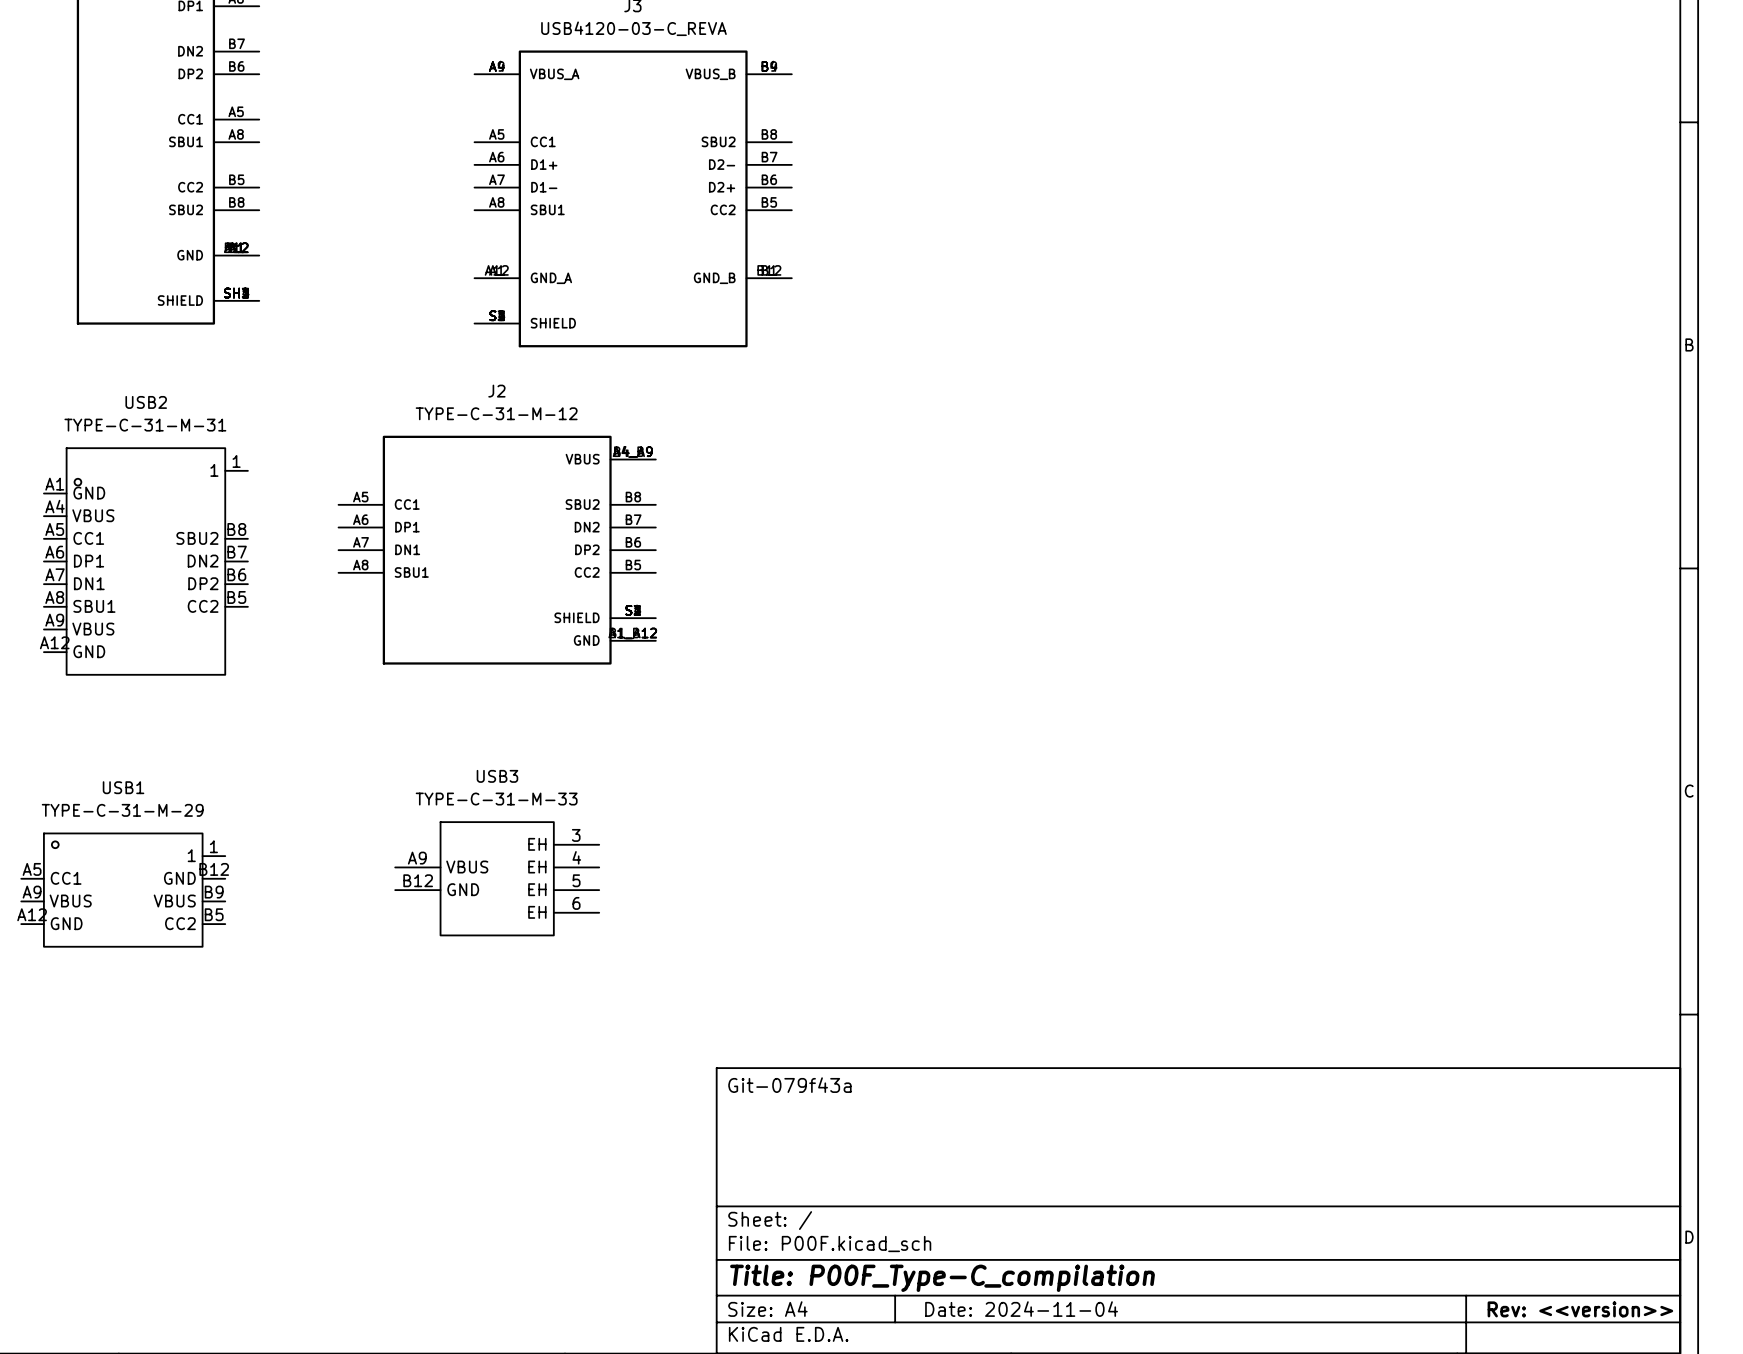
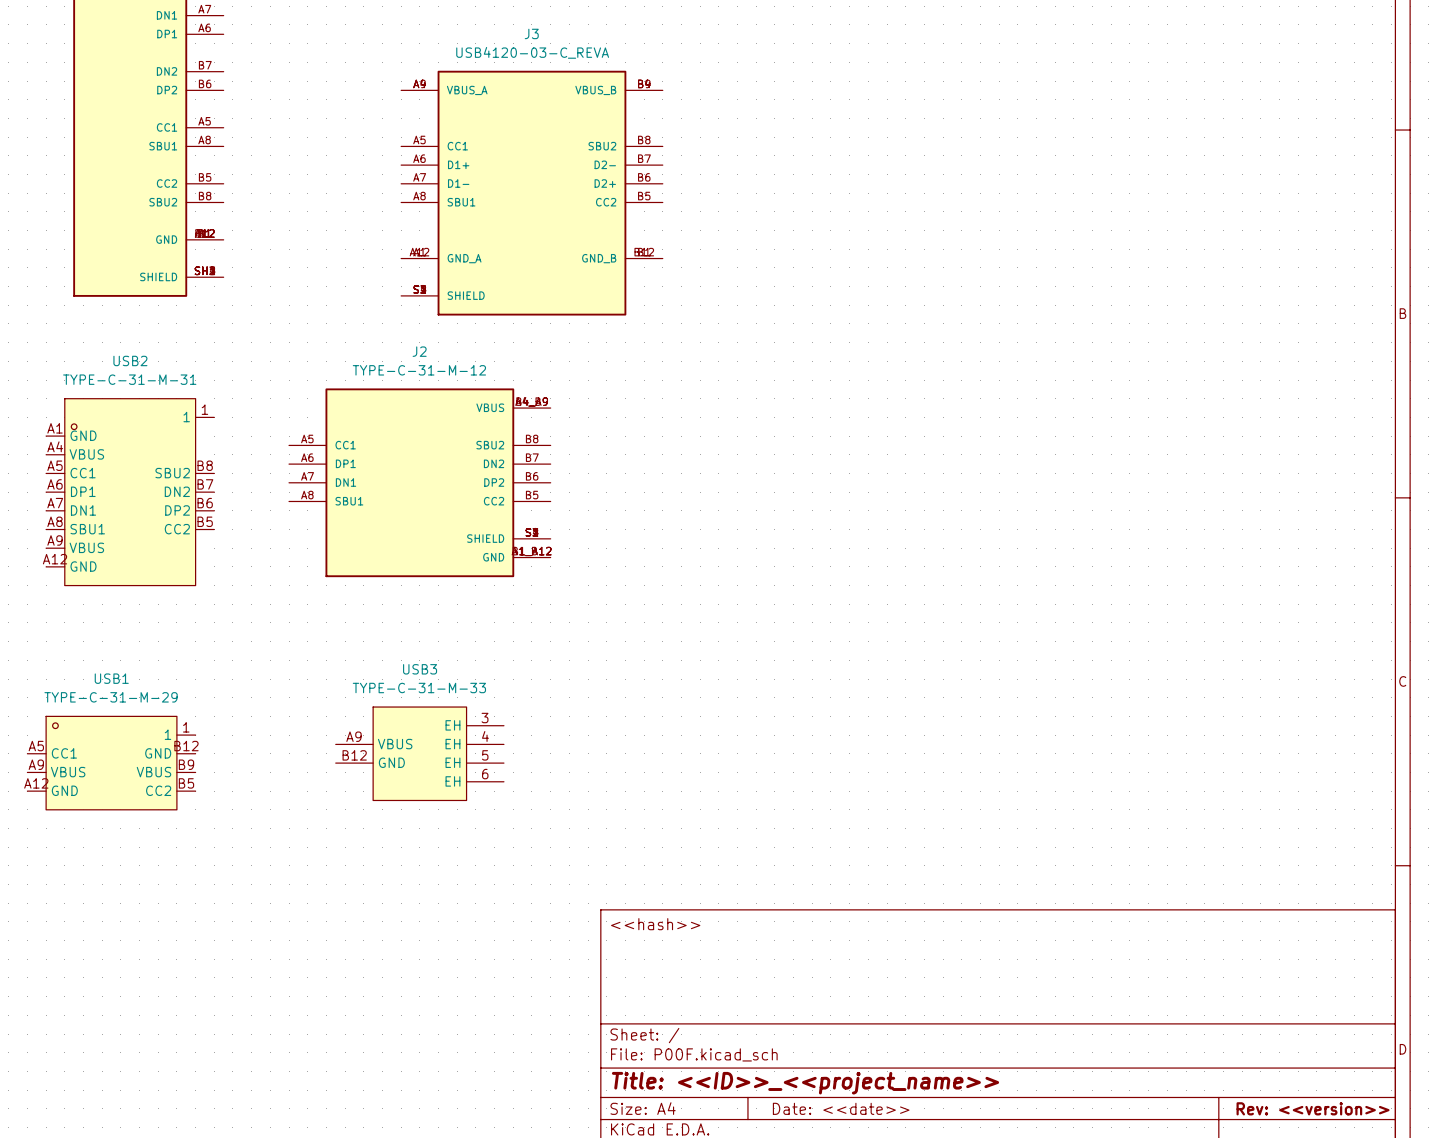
title block: Git-079f43a (789, 1085) -> <<hash>> (655, 924)
title block: Title: P00F_Type-C_compilation (942, 1278) -> Title: <<ID>>_<<project_name>> (805, 1083)
title block: Date: 2024-11-04 (1021, 1309) -> Date: <<date>> (841, 1108)

